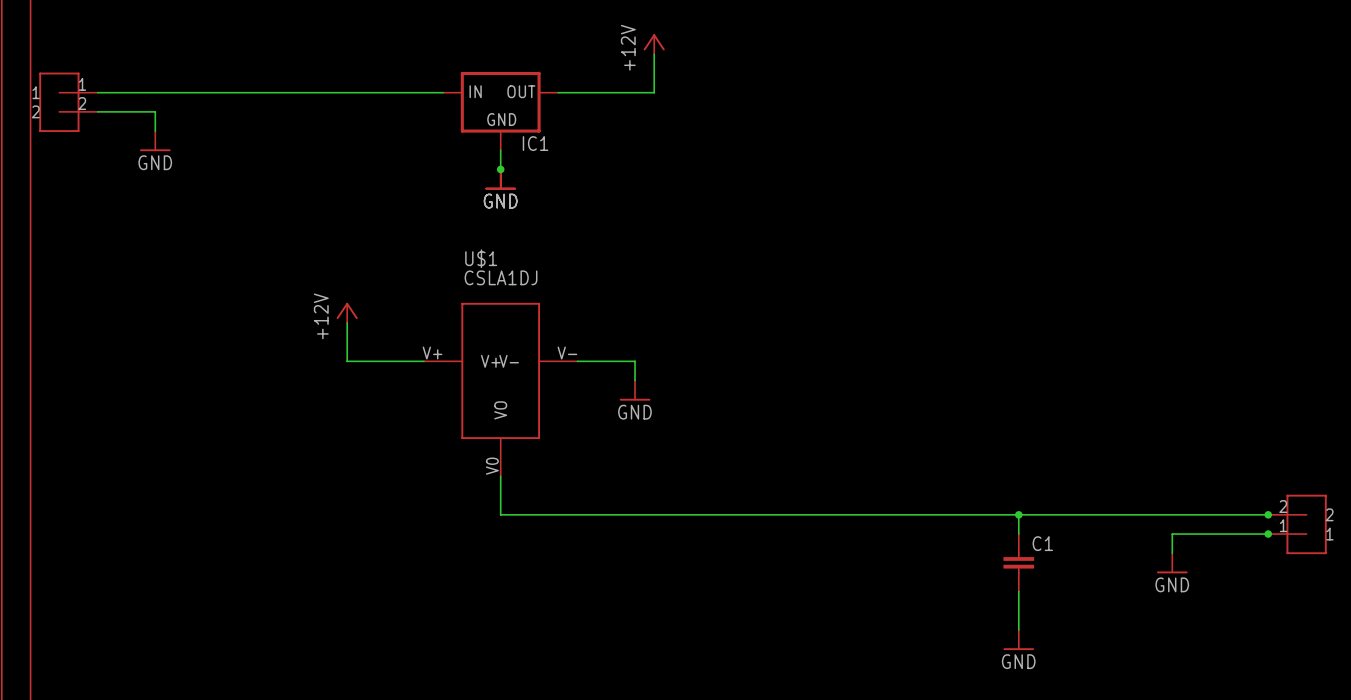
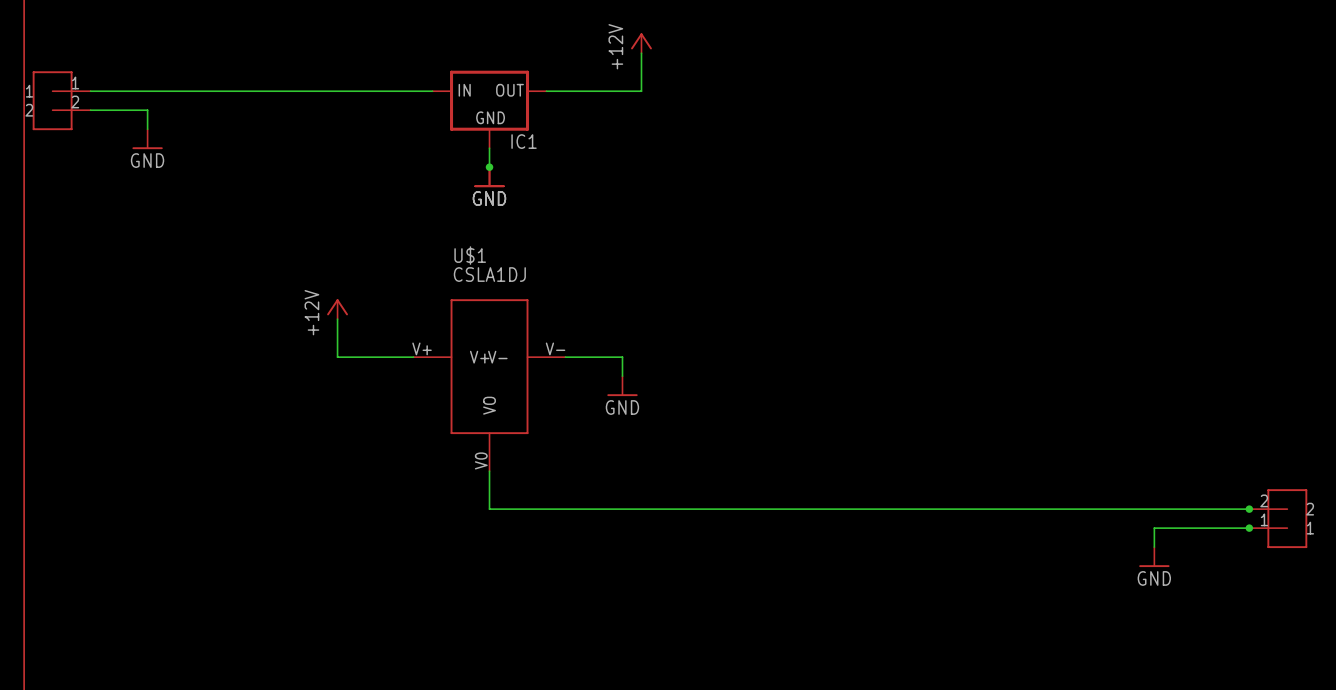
wire: (1018, 514) (1018, 534) -> none
junction: (1018, 514) -> none
C1: (1018, 562) -> none
wire: (1018, 591) (1018, 629) -> none
power symbol: GND (1018, 640) -> none

